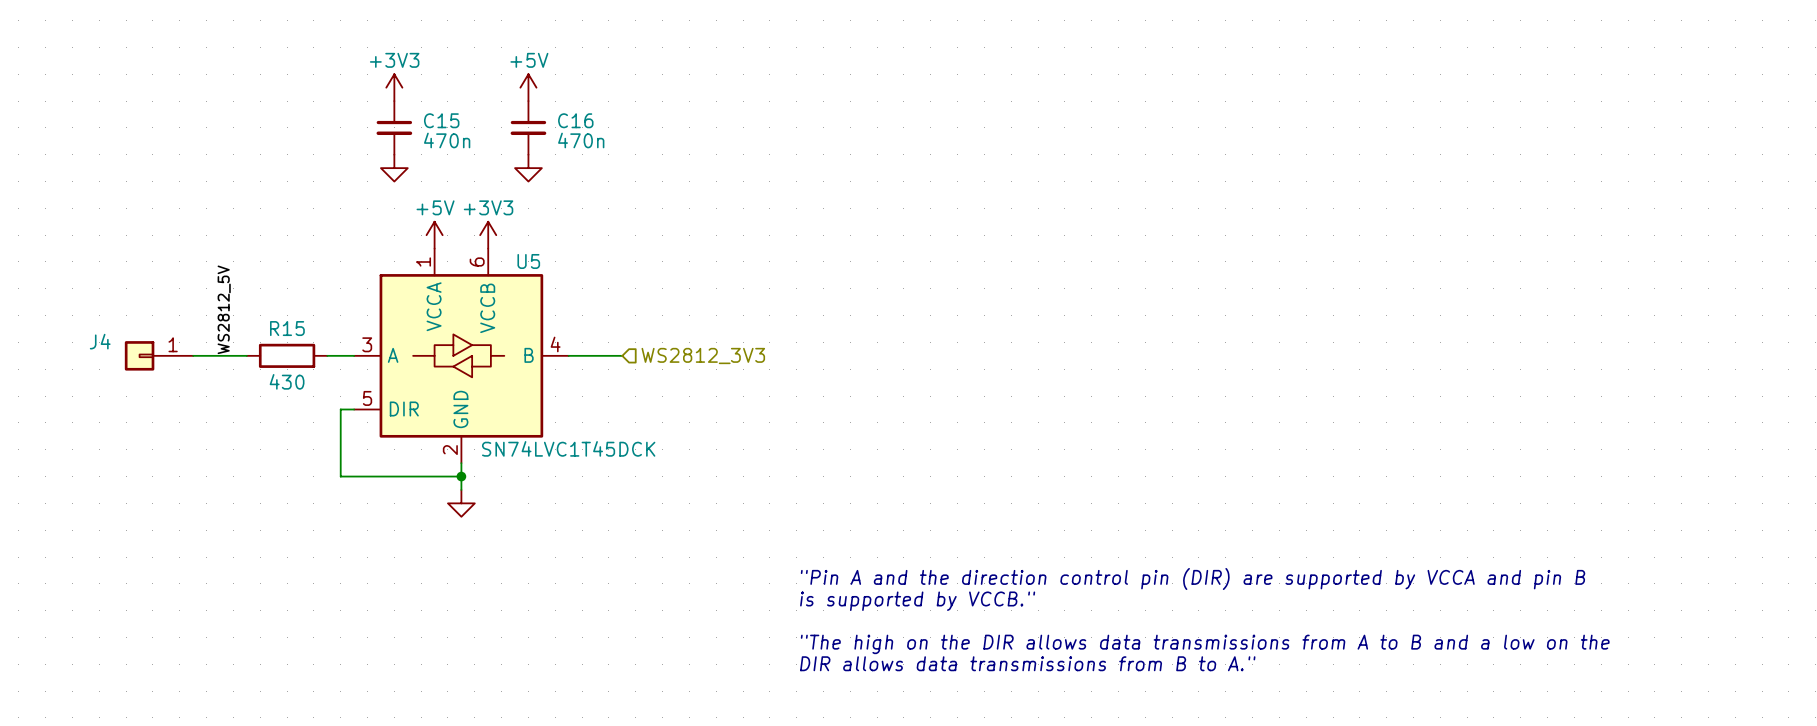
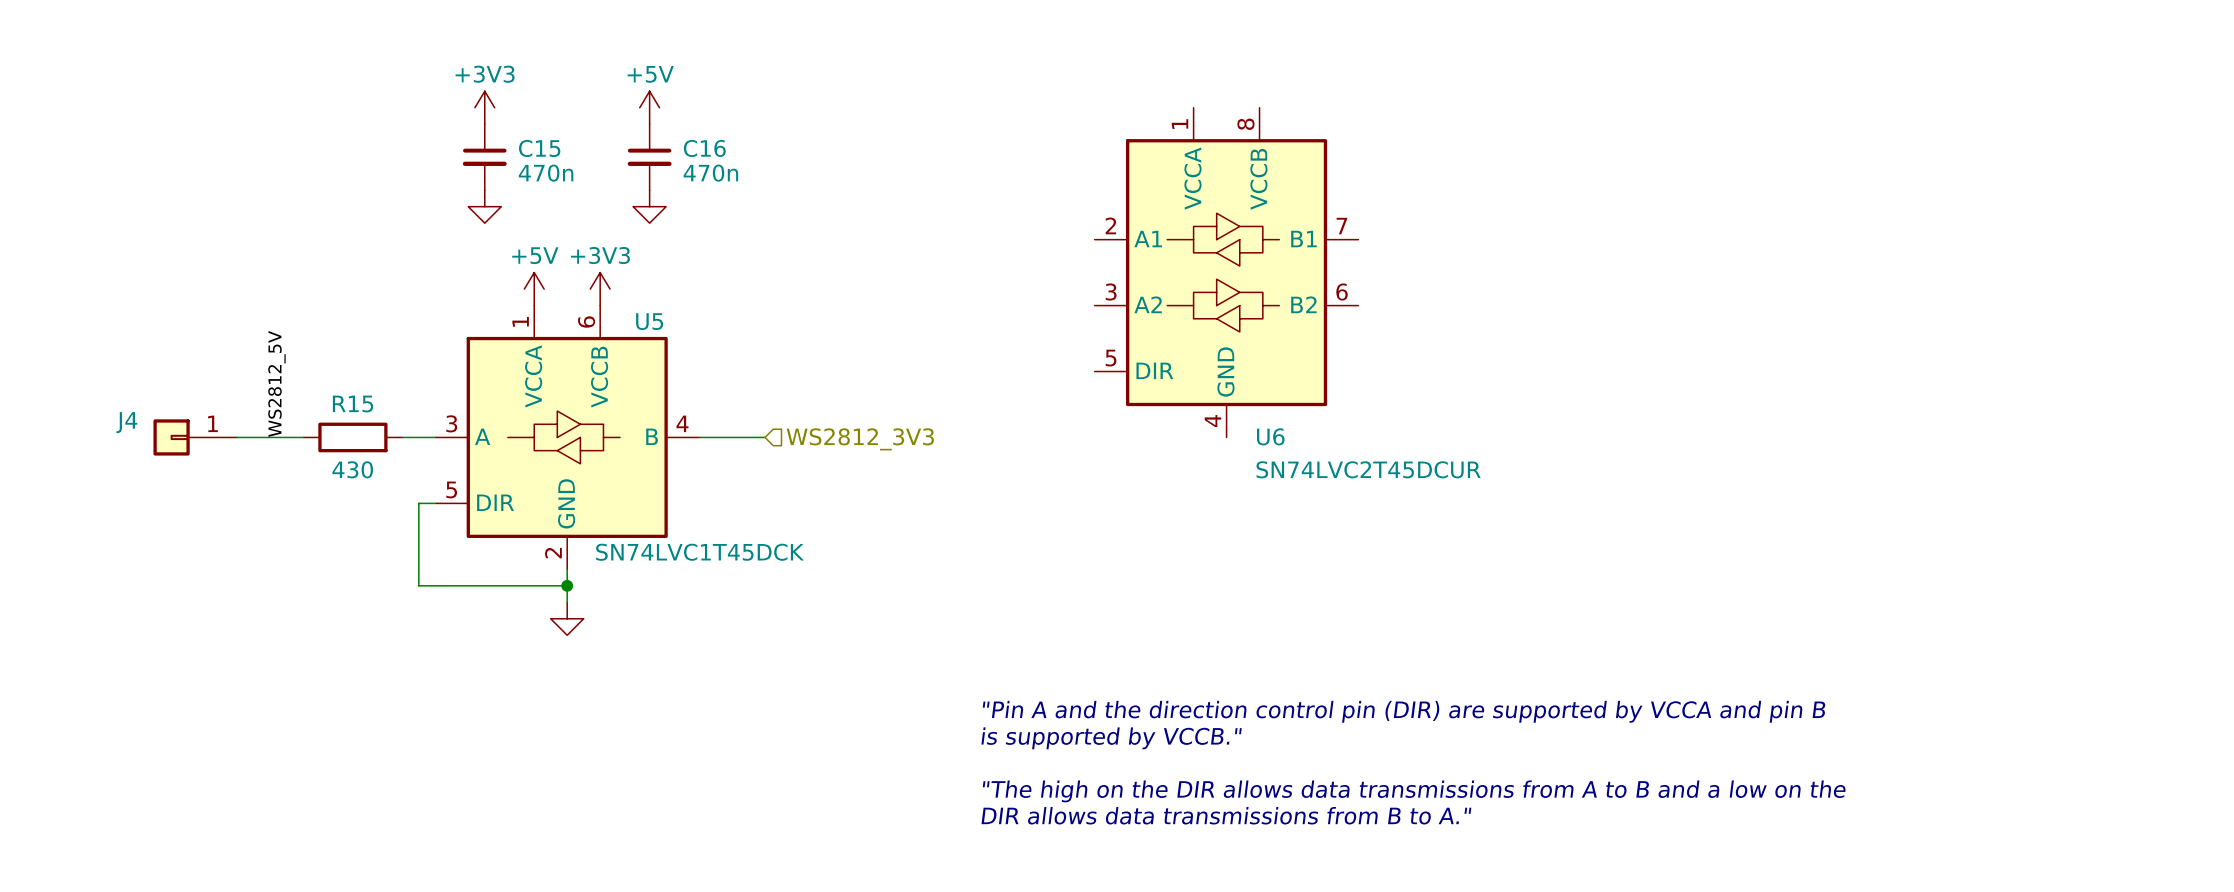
U6: none -> SN74LVC2T45DCUR (1226, 272)

